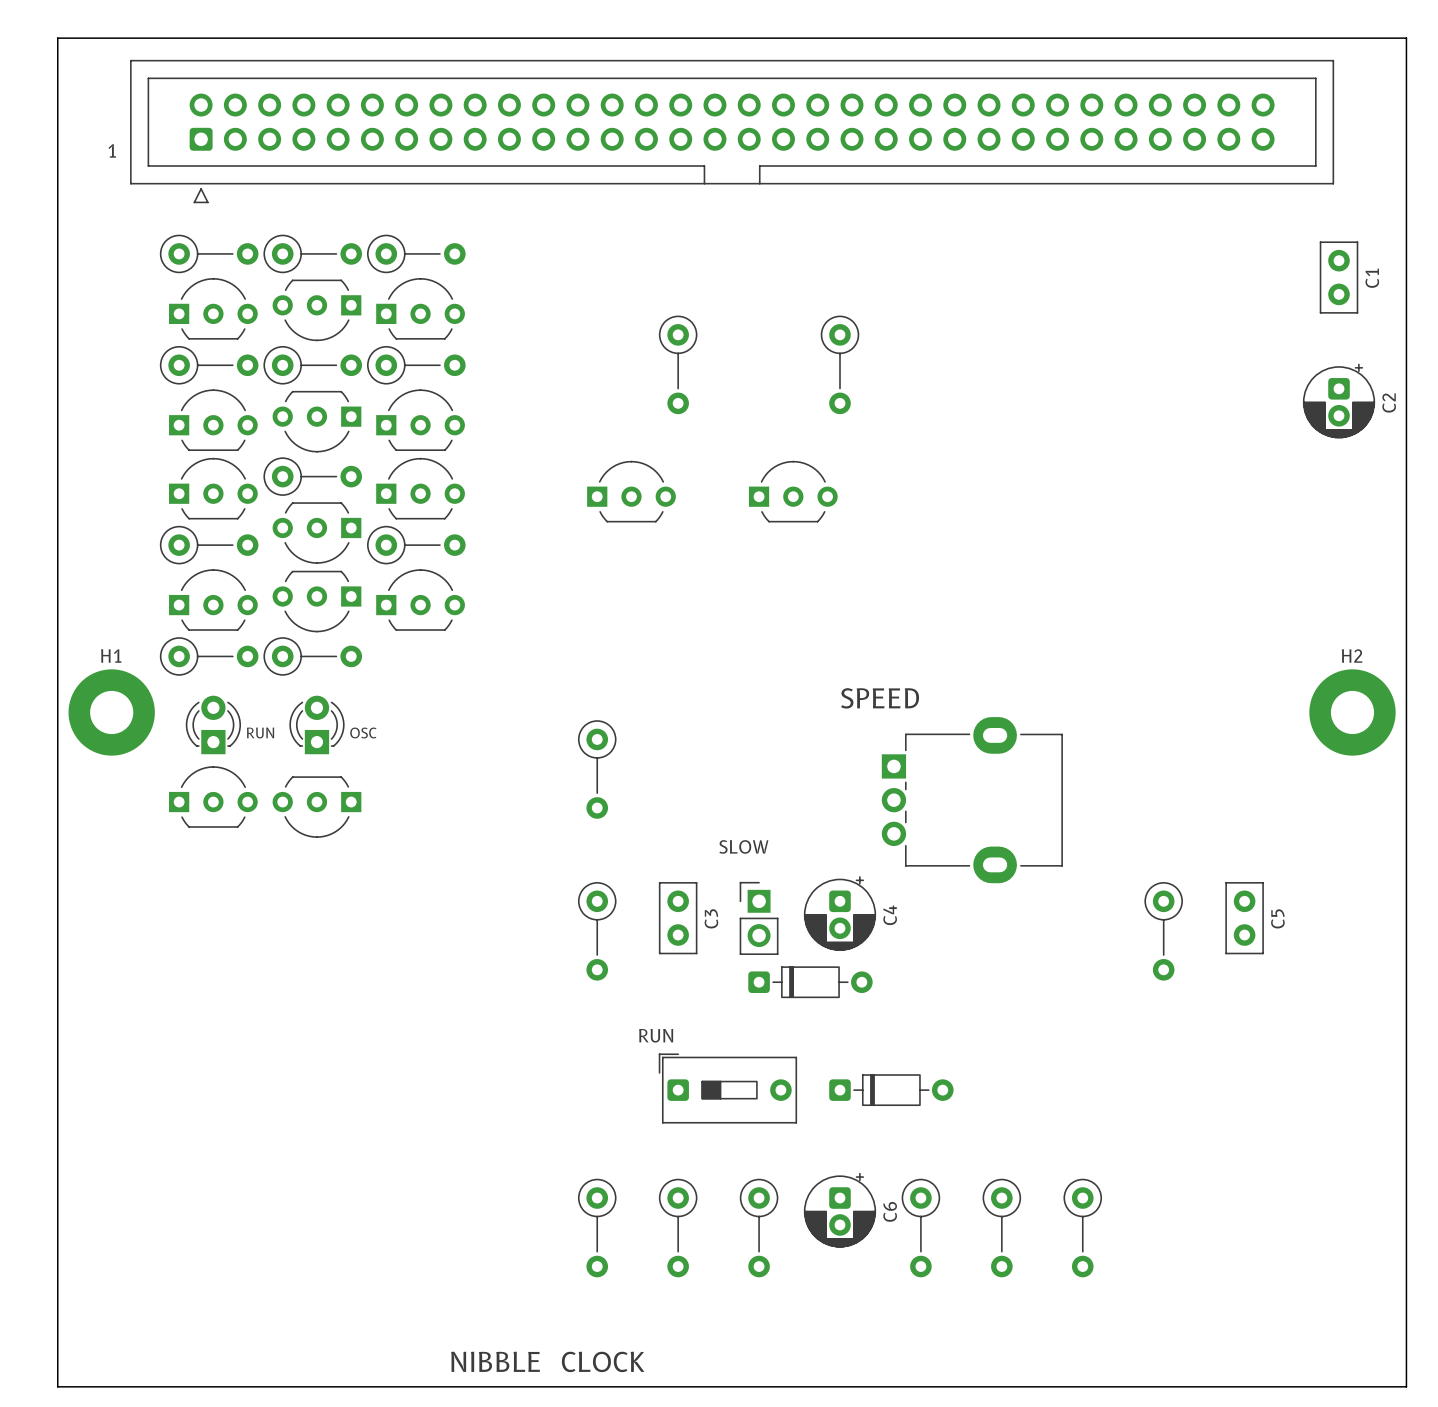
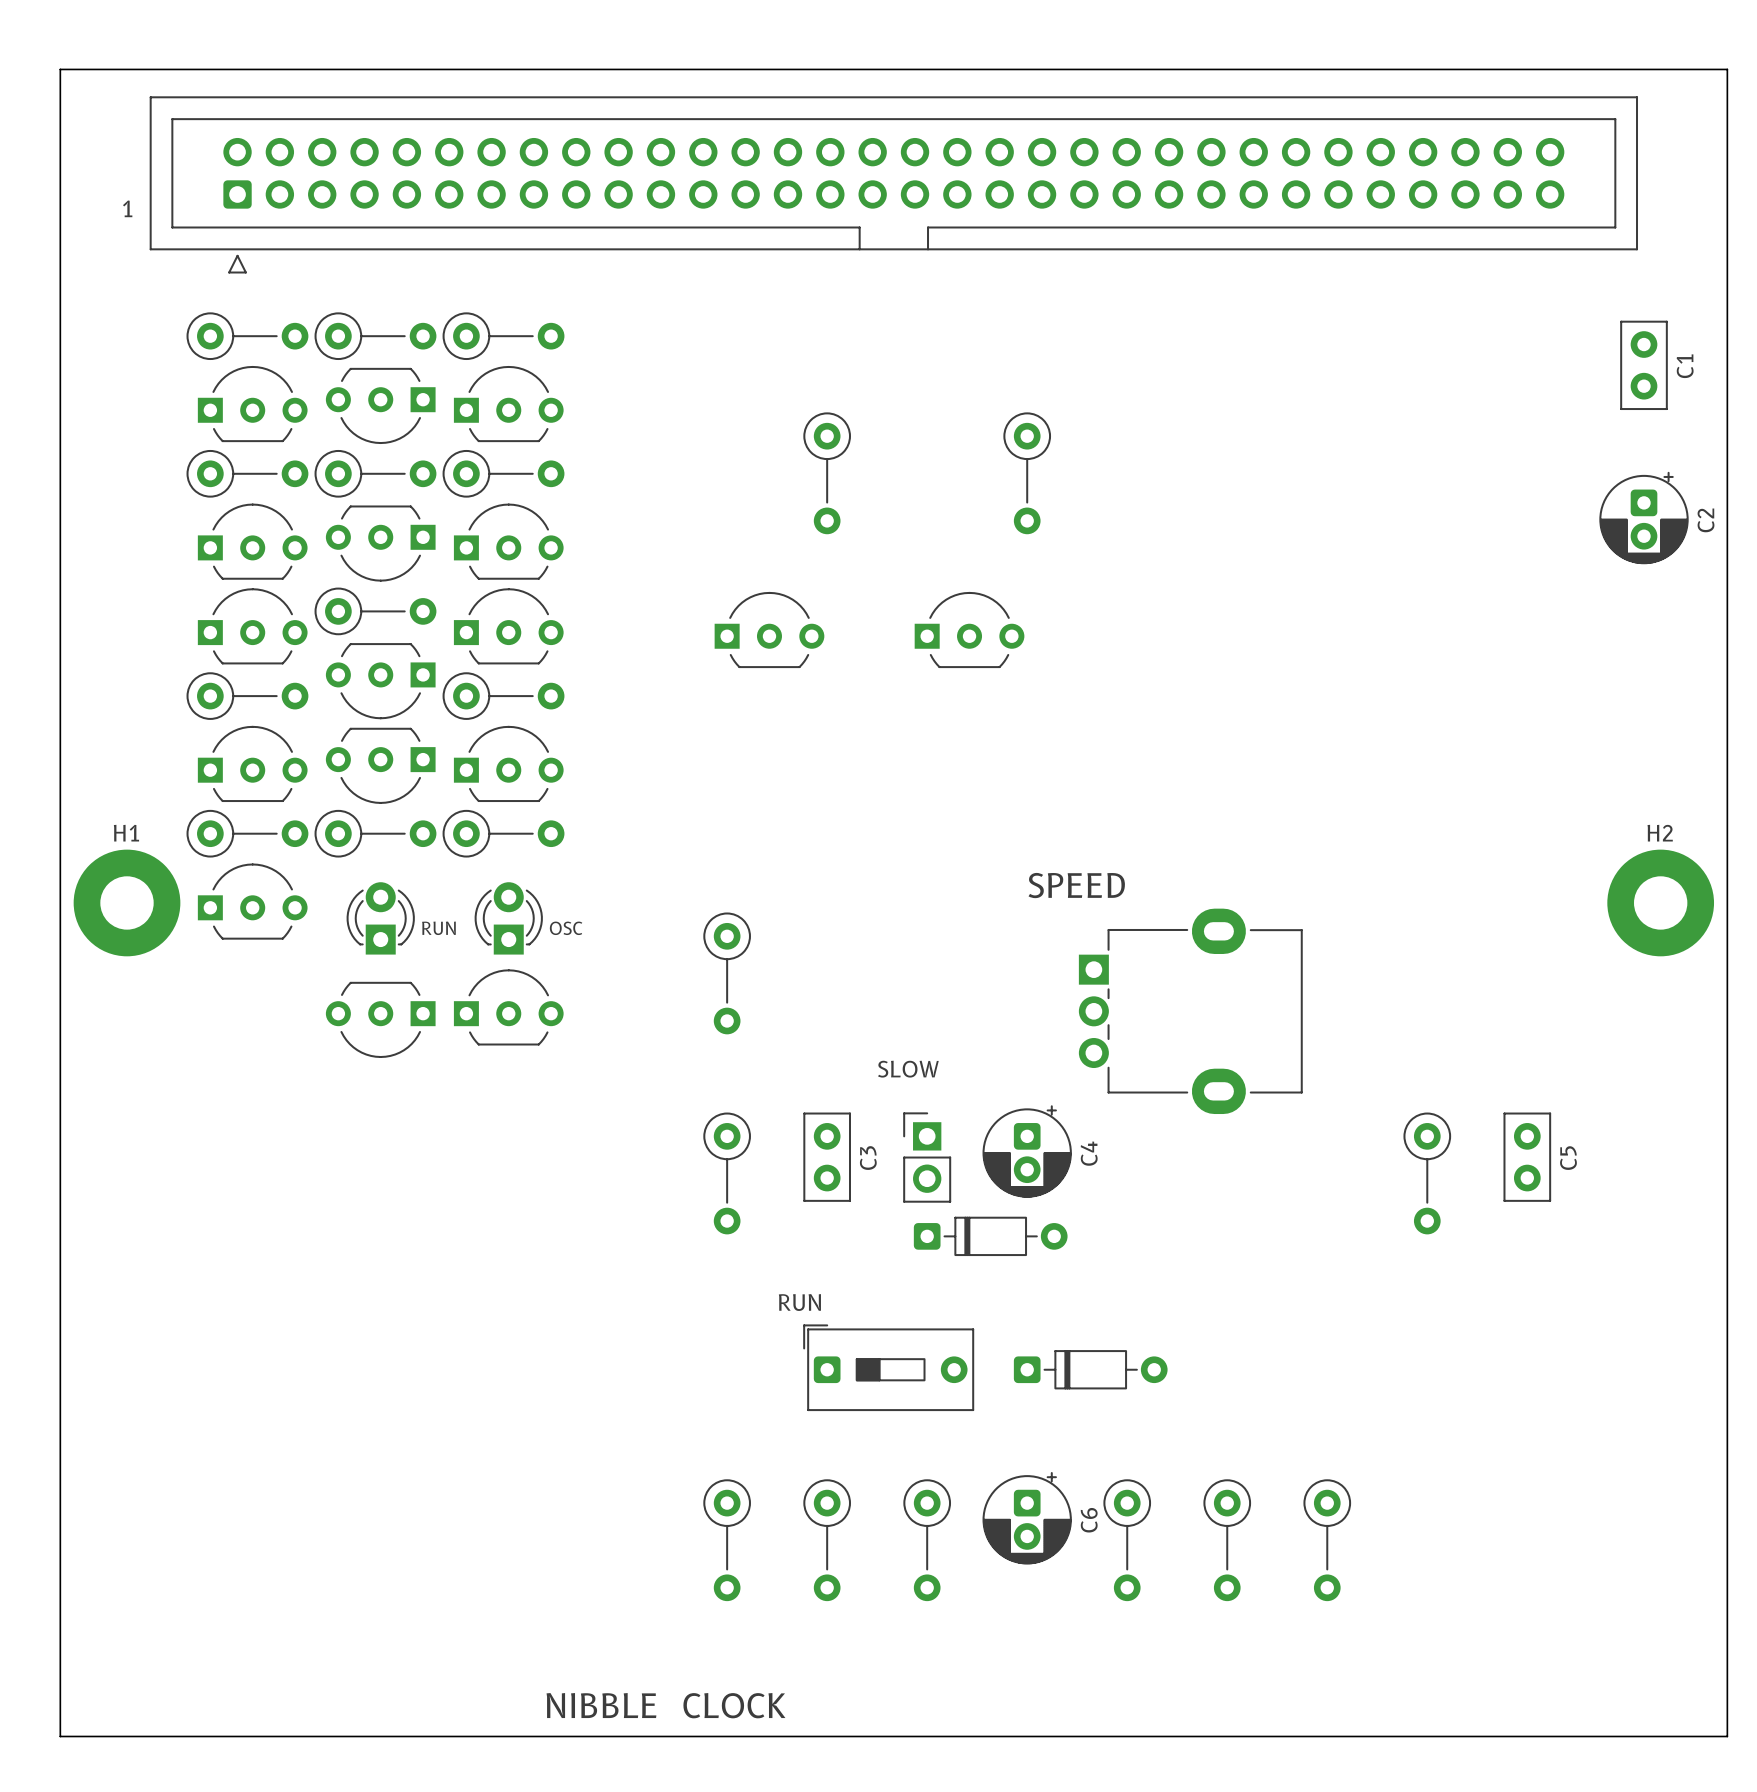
part: none -> (503, 833)
part position: (213, 724) -> (508, 918)
text: RUN (260, 732) -> none
text: OSC (363, 732) -> RUN (438, 928)
text: none -> OSC (566, 928)
part position: (213, 796) -> (252, 901)
part: none -> (508, 1007)

